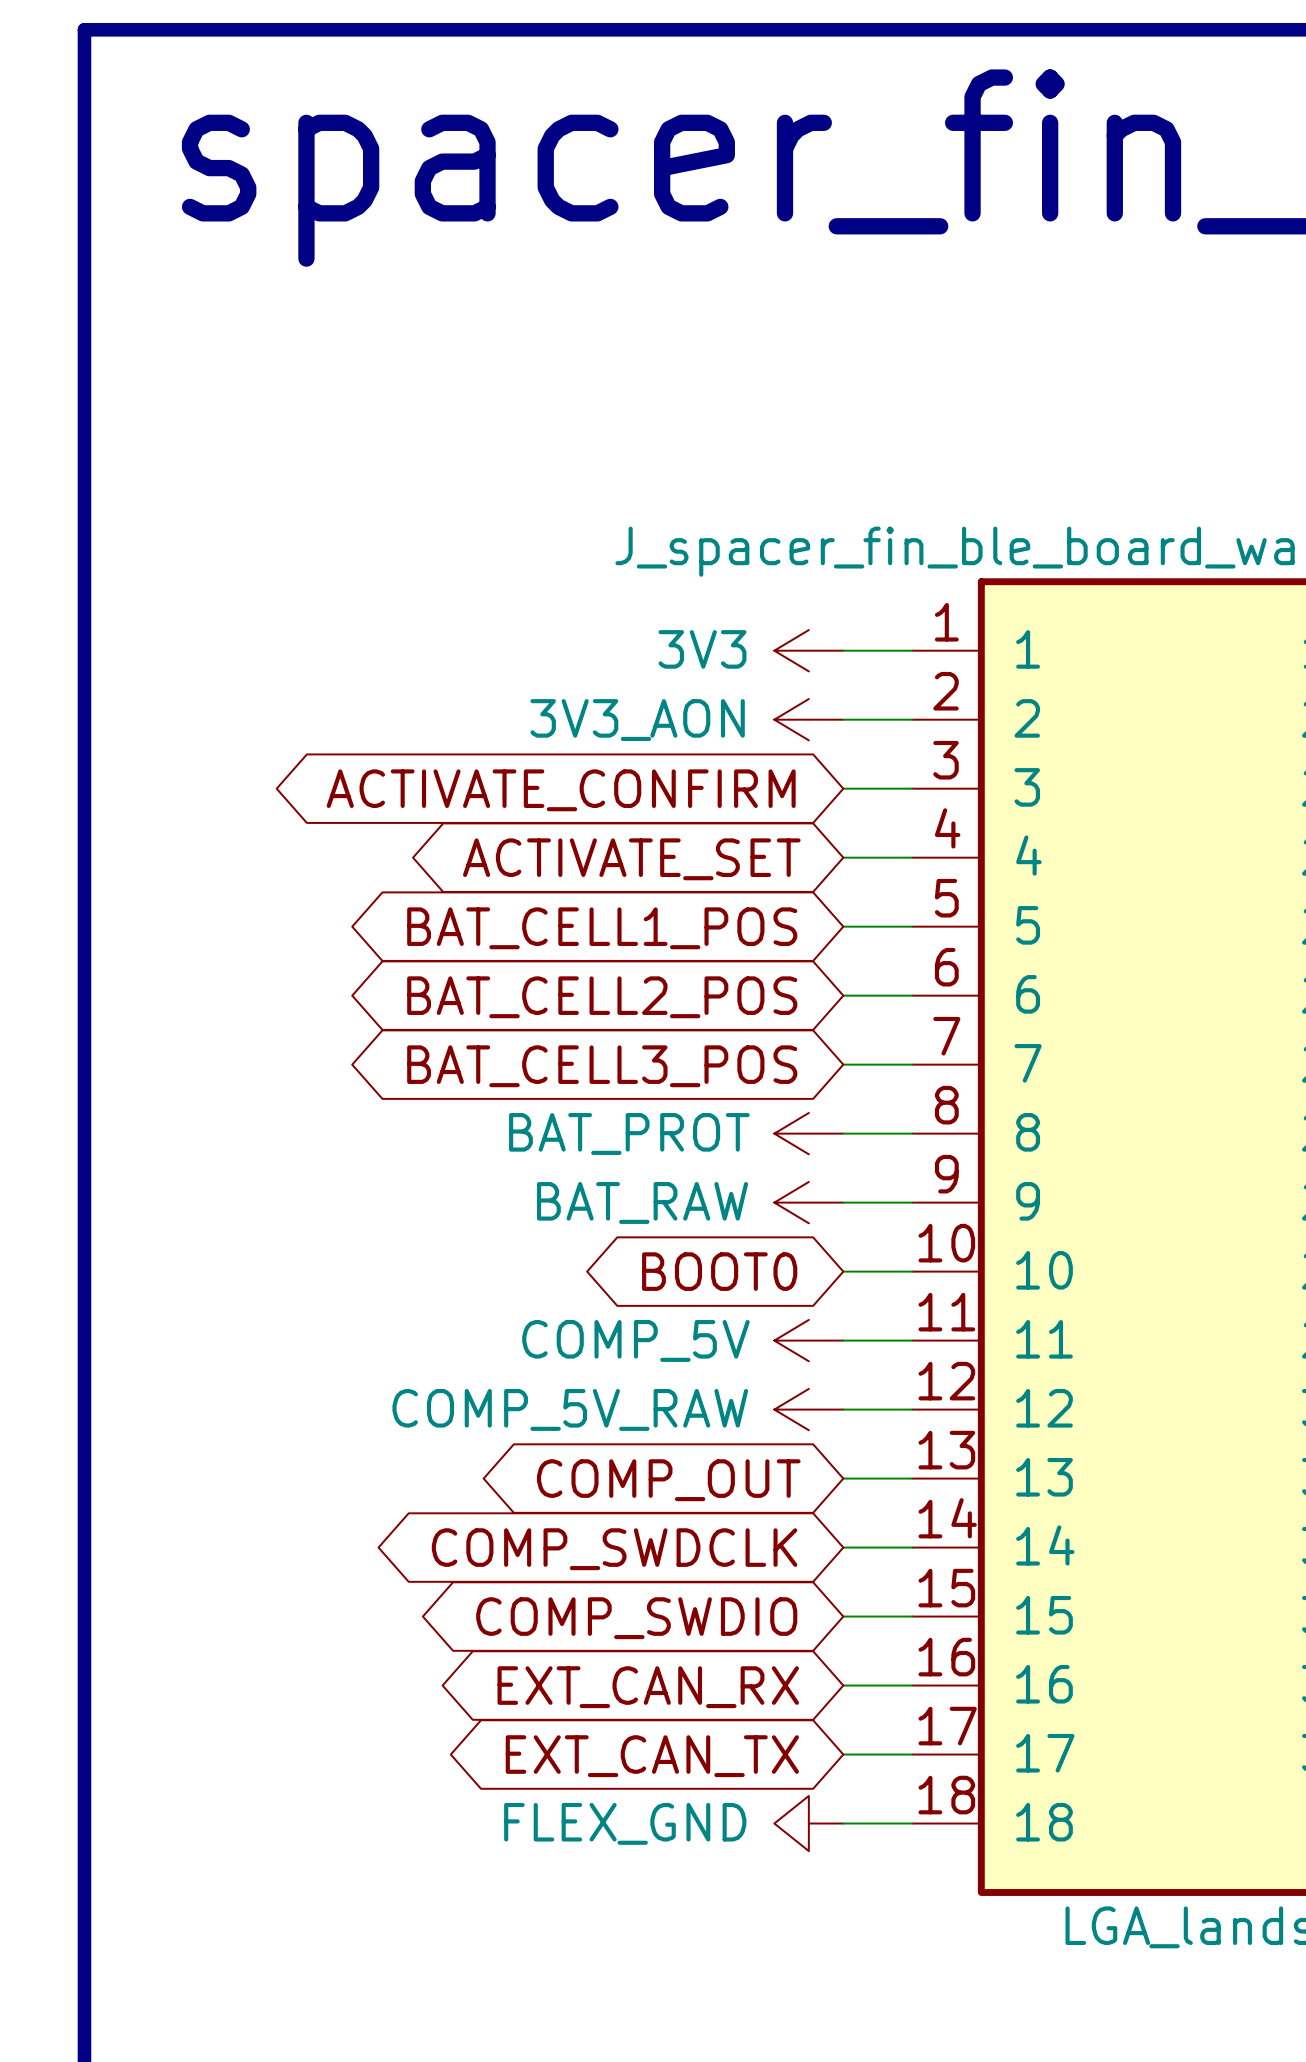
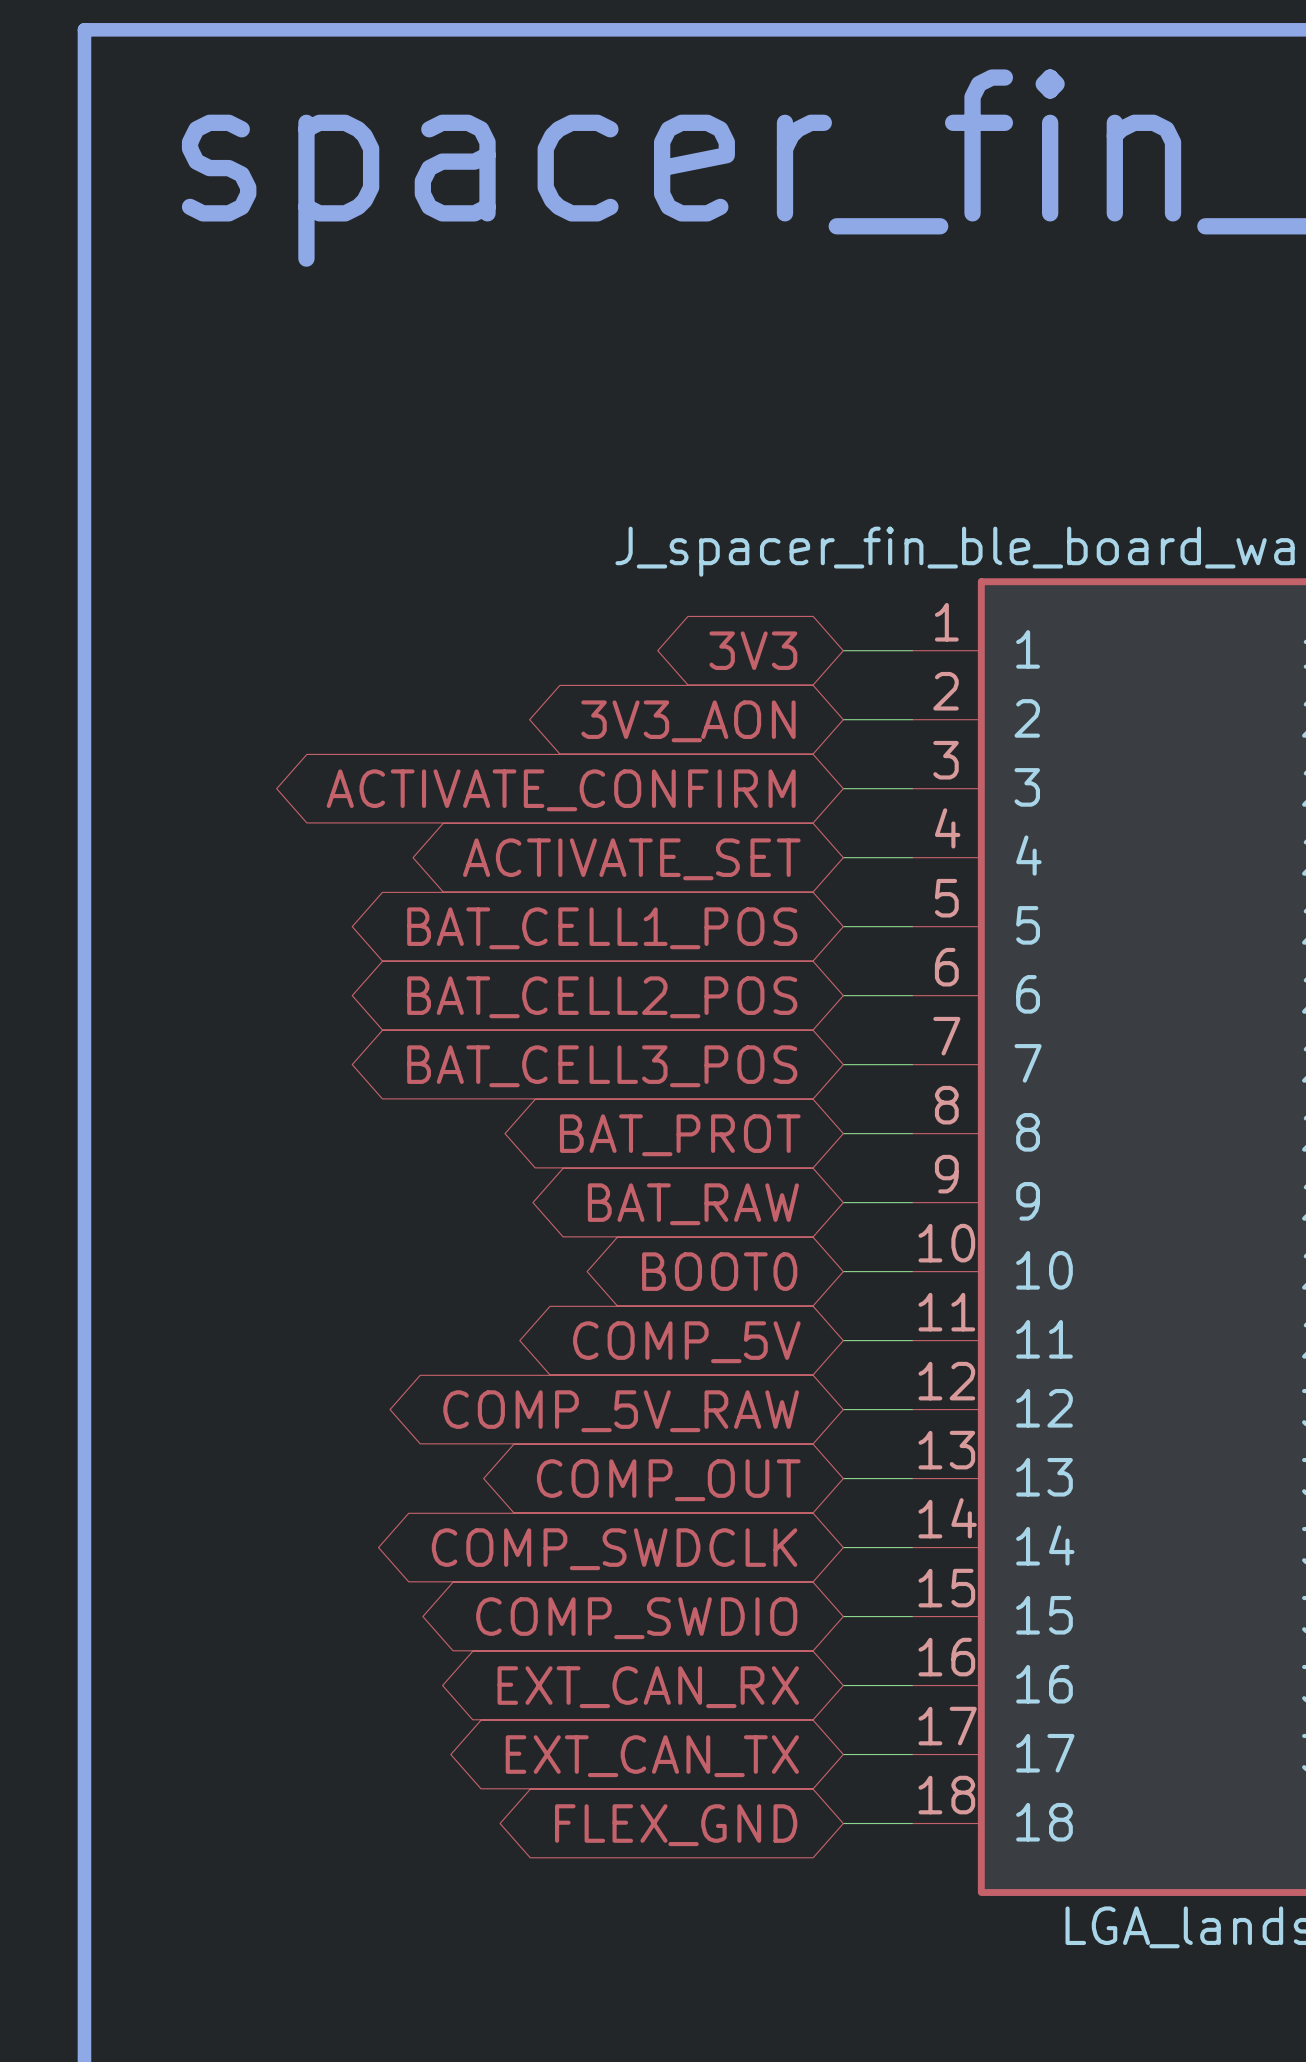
global label: none -> 3V3 (753, 650)
power symbol: 3V3 (808, 650) -> none
power symbol: 3V3_AON (808, 719) -> none
global label: none -> 3V3_AON (688, 721)
power symbol: BAT_PROT (808, 1133) -> none
global label: none -> BAT_PROT (680, 1135)
power symbol: BAT_RAW (808, 1202) -> none
global label: none -> BAT_RAW (693, 1204)
power symbol: COMP_5V (808, 1340) -> none
global label: none -> COMP_5V (686, 1342)
power symbol: COMP_5V_RAW (808, 1409) -> none
global label: none -> COMP_5V_RAW (621, 1411)
power symbol: FLEX_GND (808, 1823) -> none
global label: none -> FLEX_GND (676, 1825)

